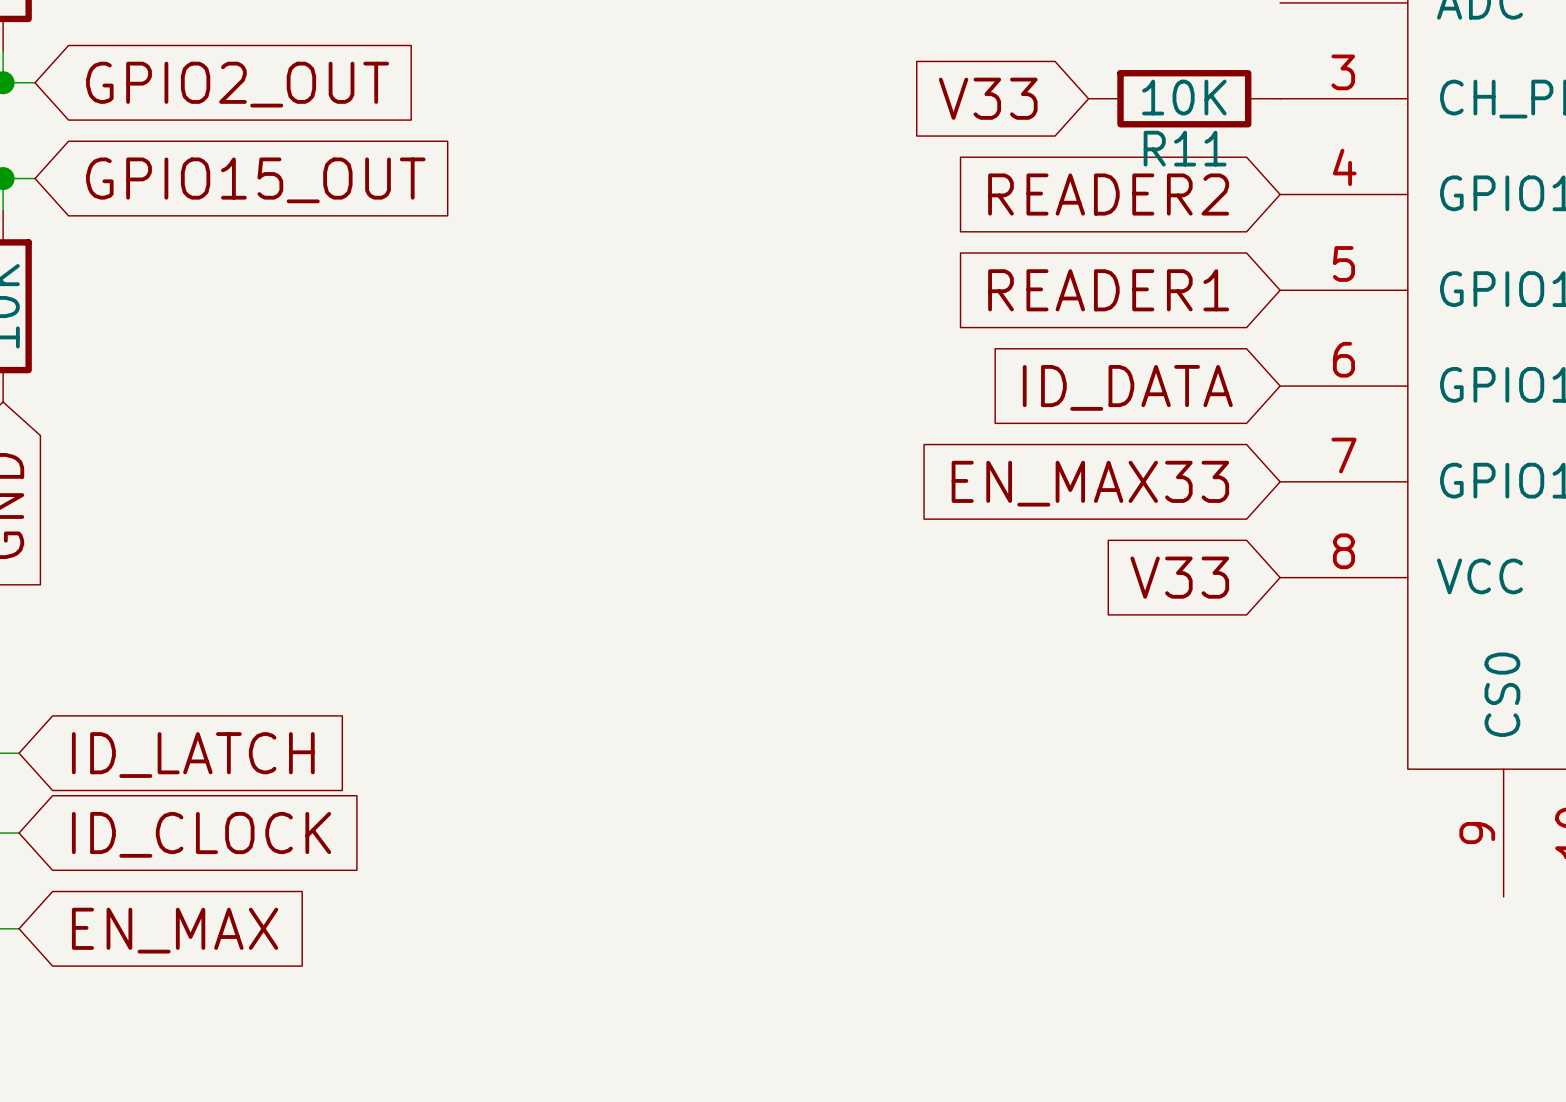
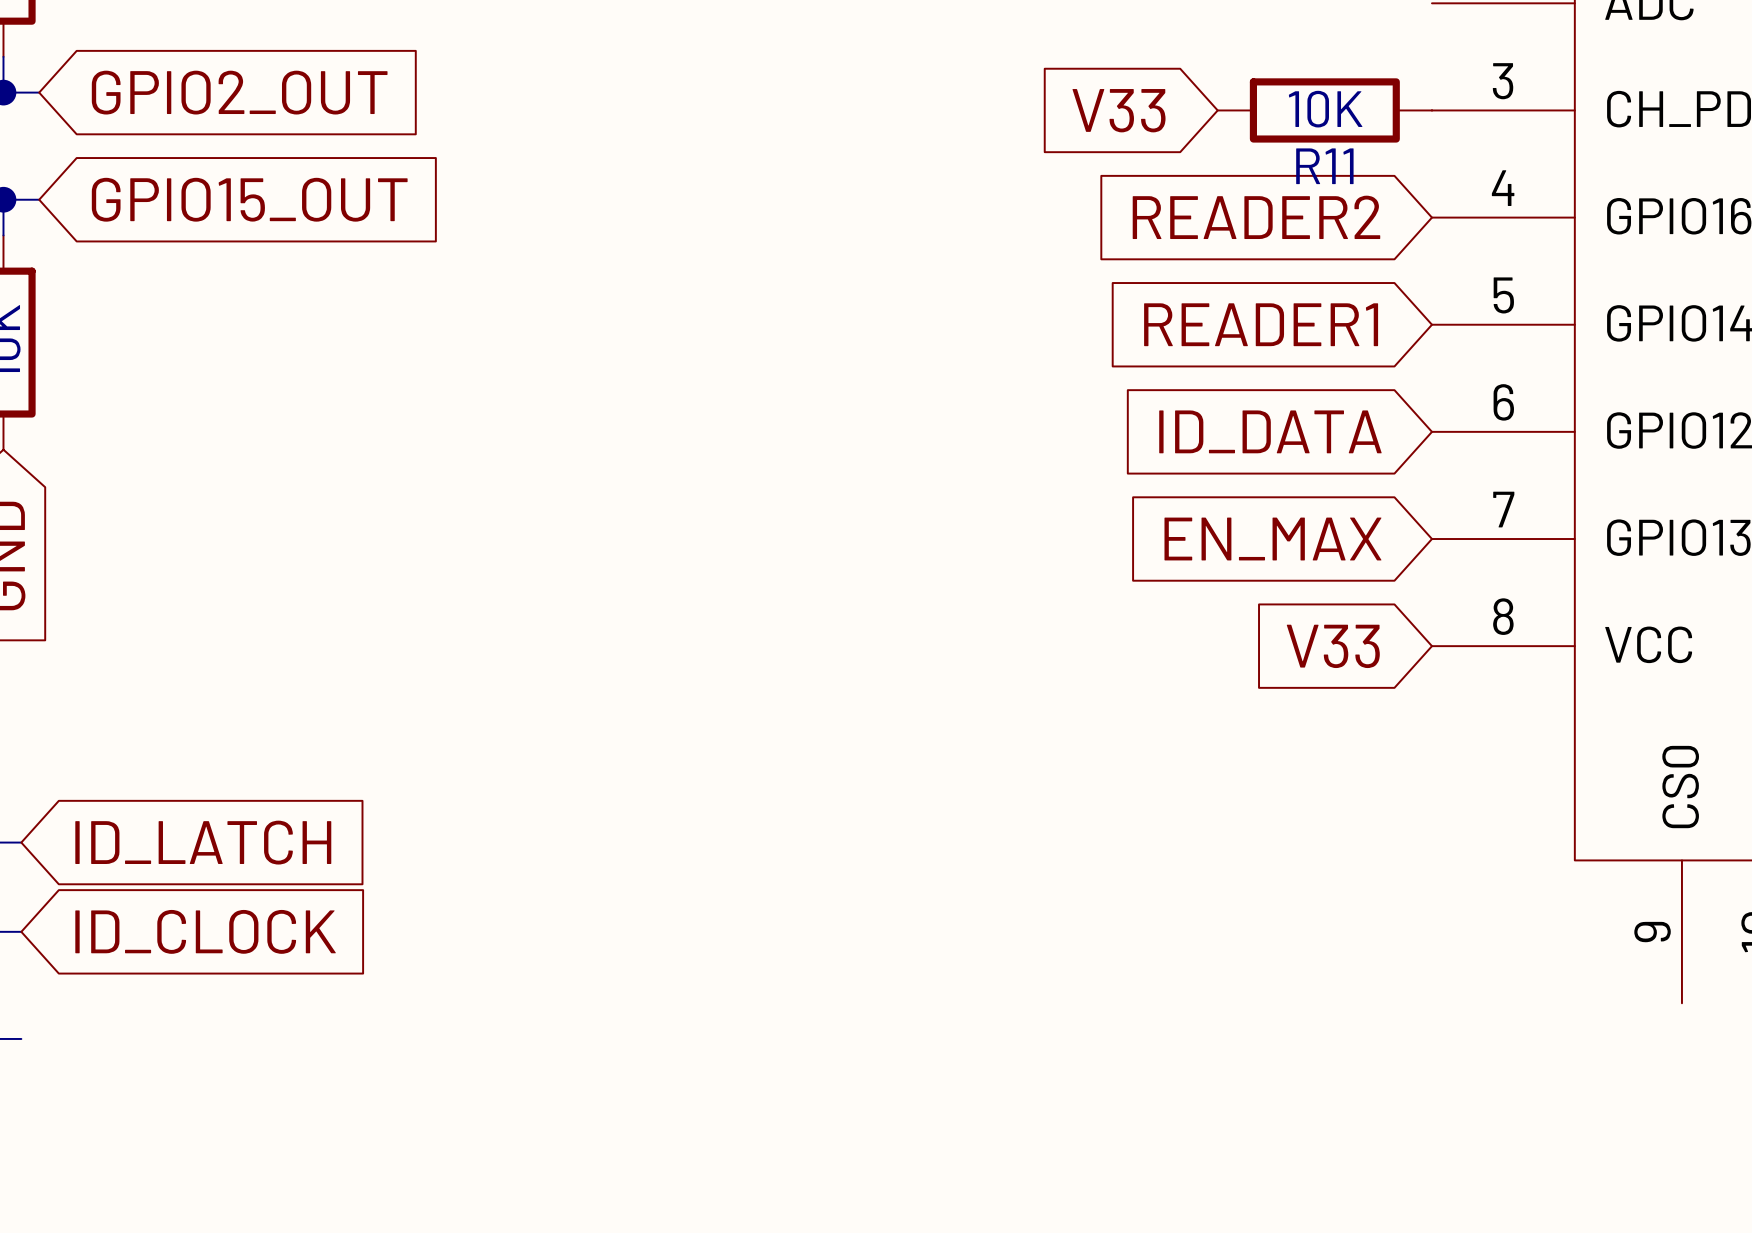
global label: EN_MAX33 (1090, 483) -> EN_MAX (1272, 539)
global label: EN_MAX (175, 930) -> none

